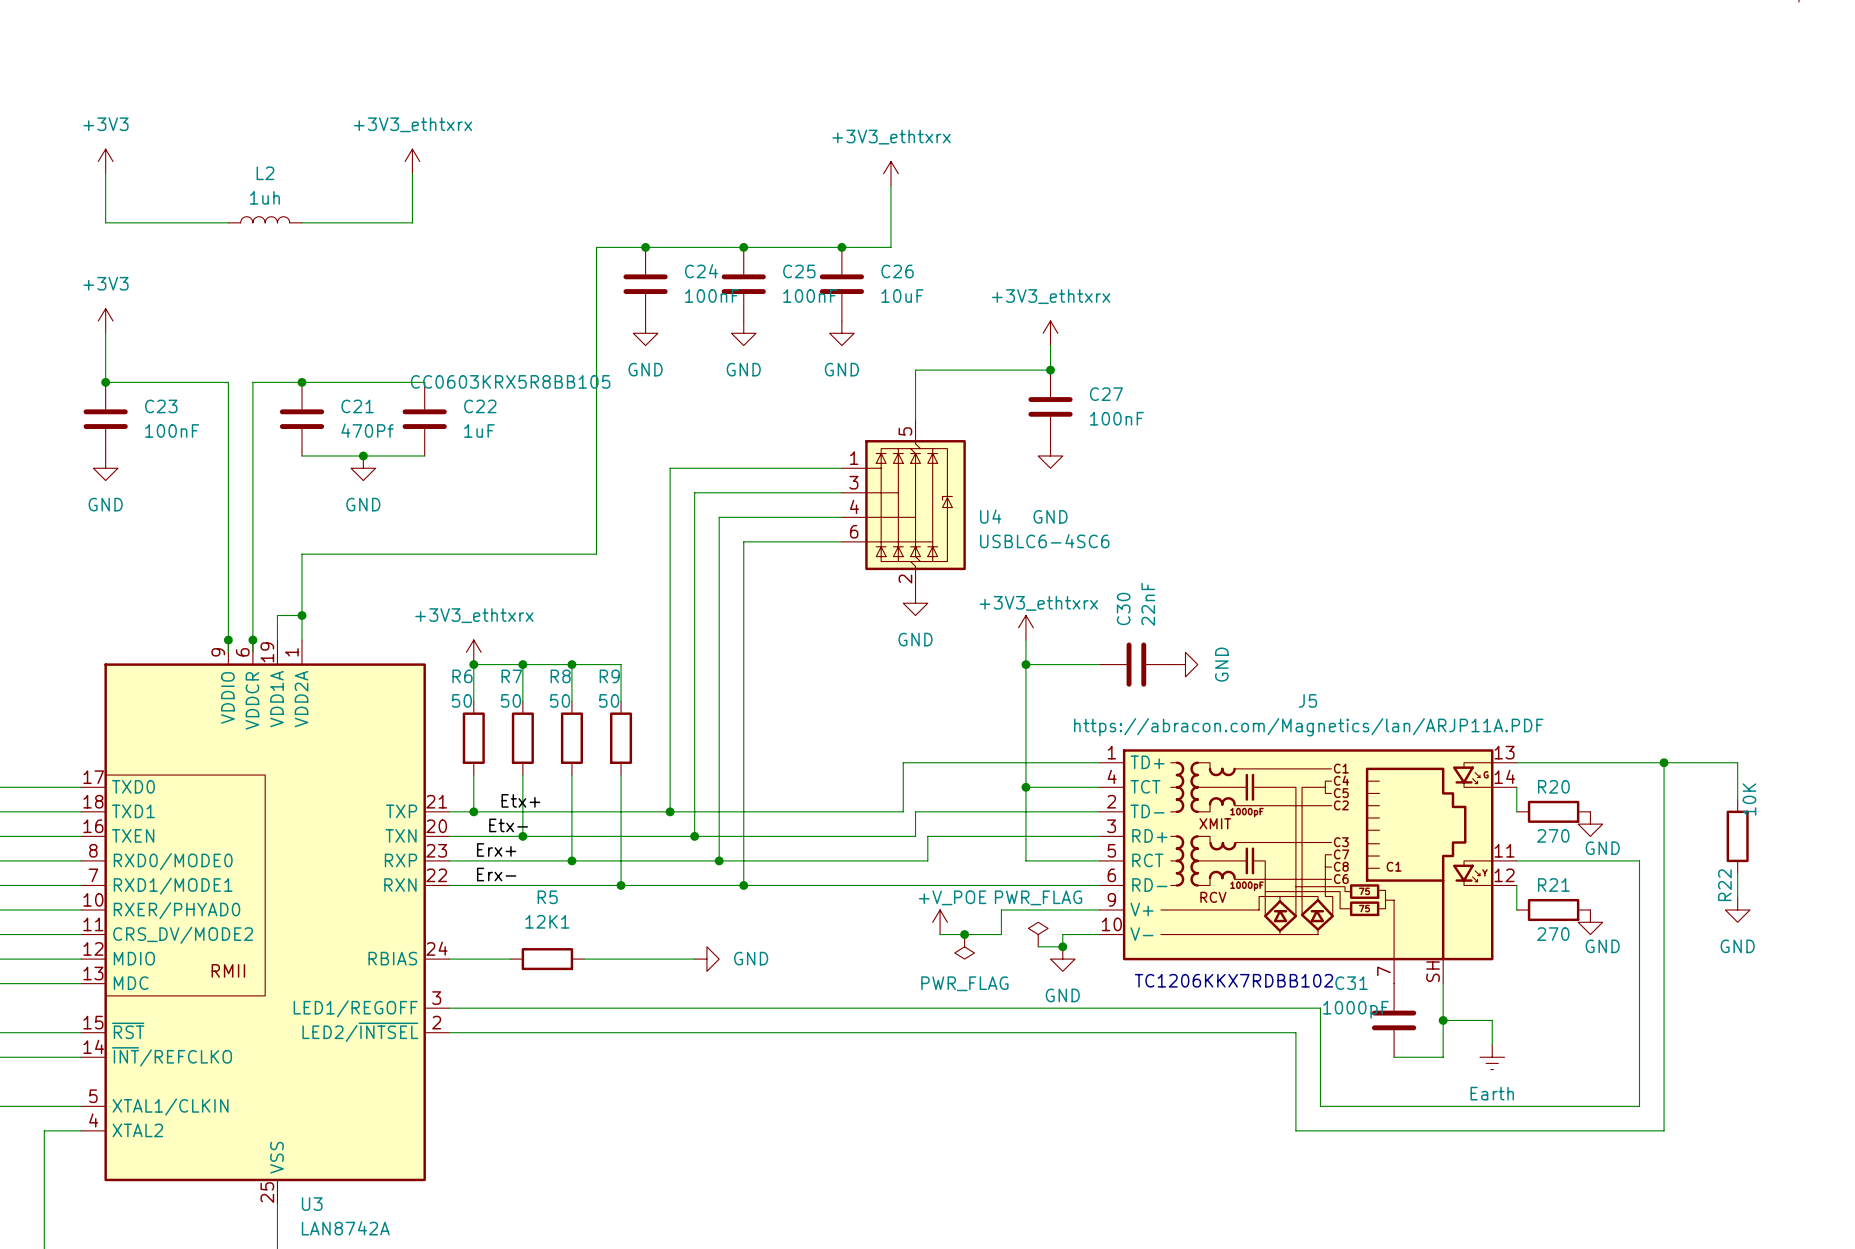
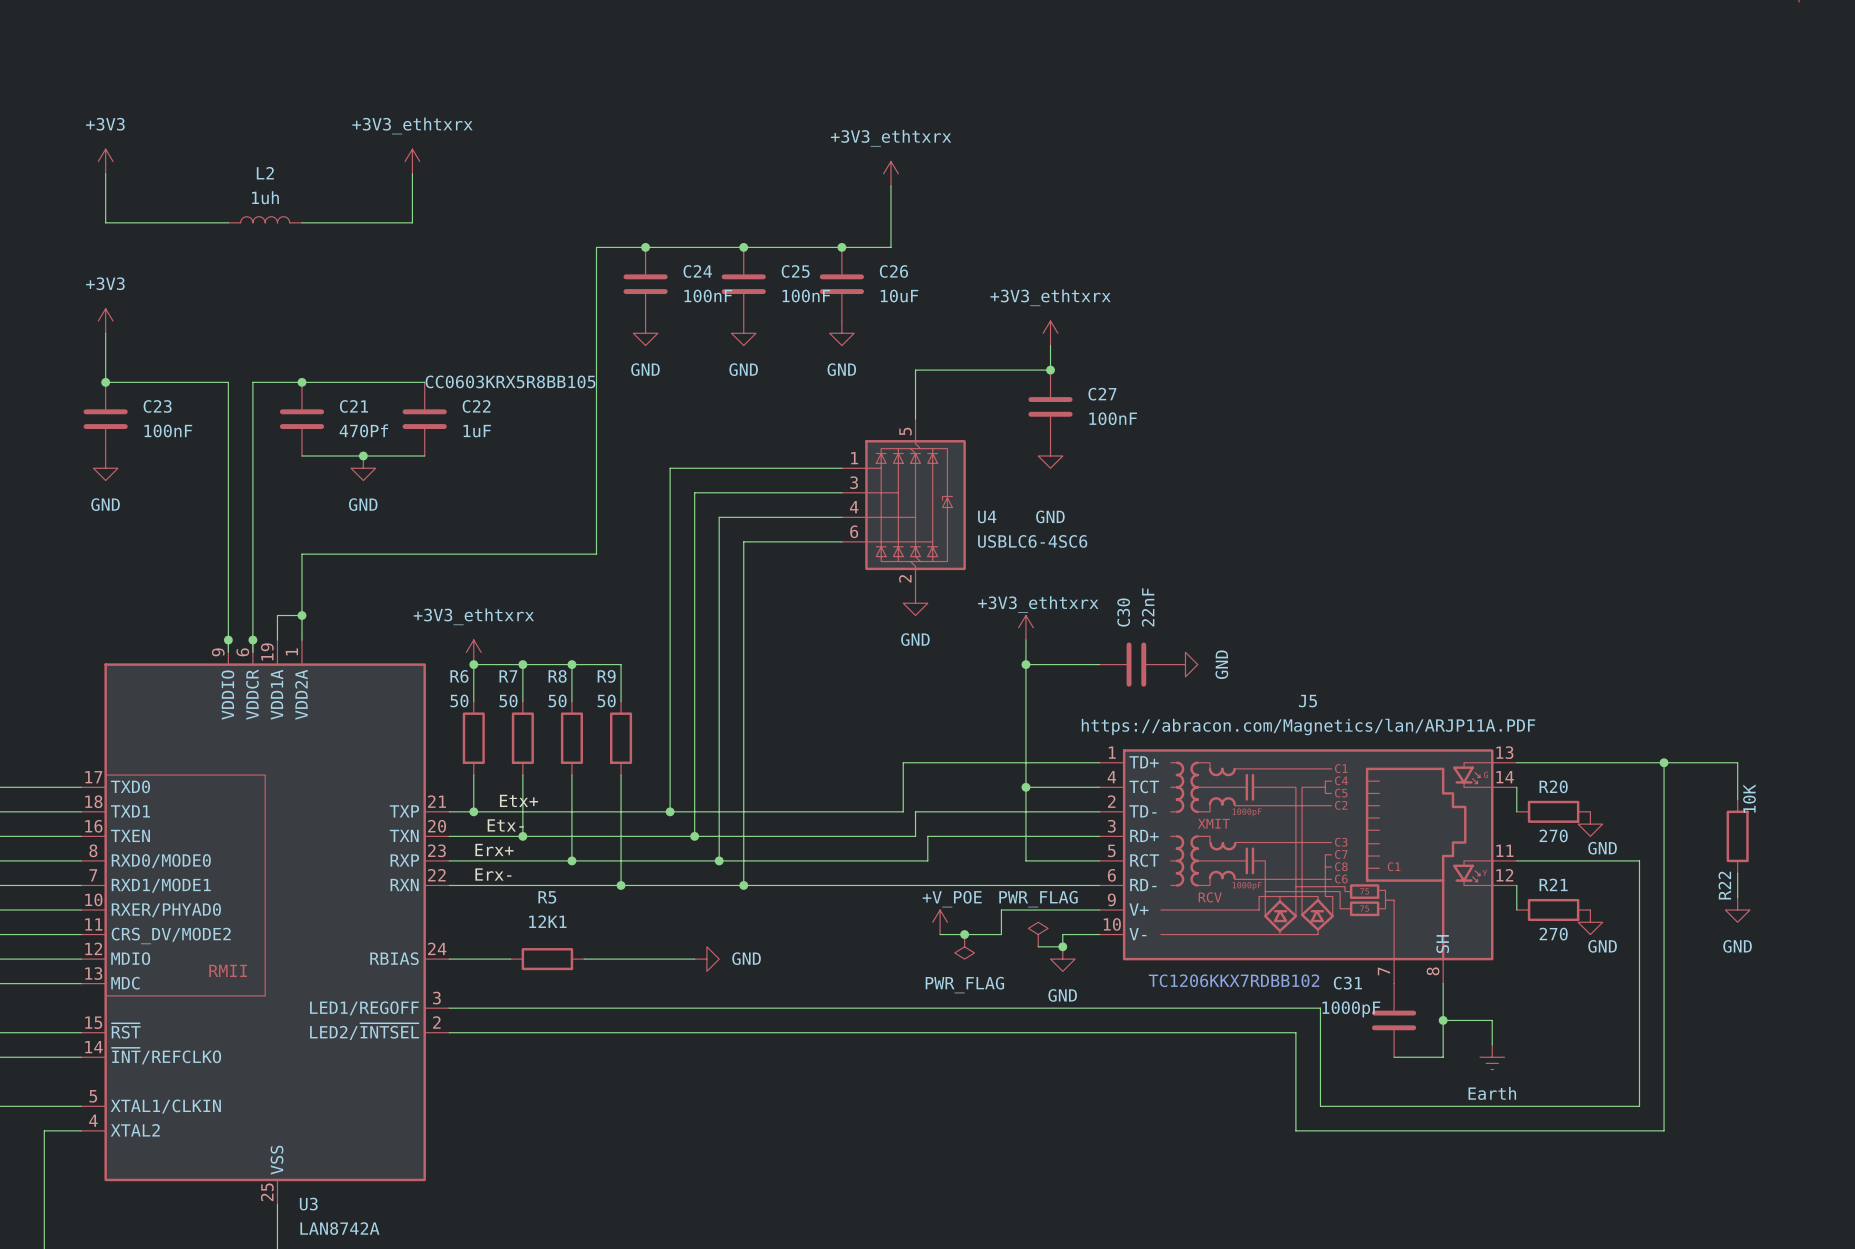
J5 pin name: none -> SH (1442, 944)
J5 pin number: SH (1433, 971) -> 8 (1433, 971)

